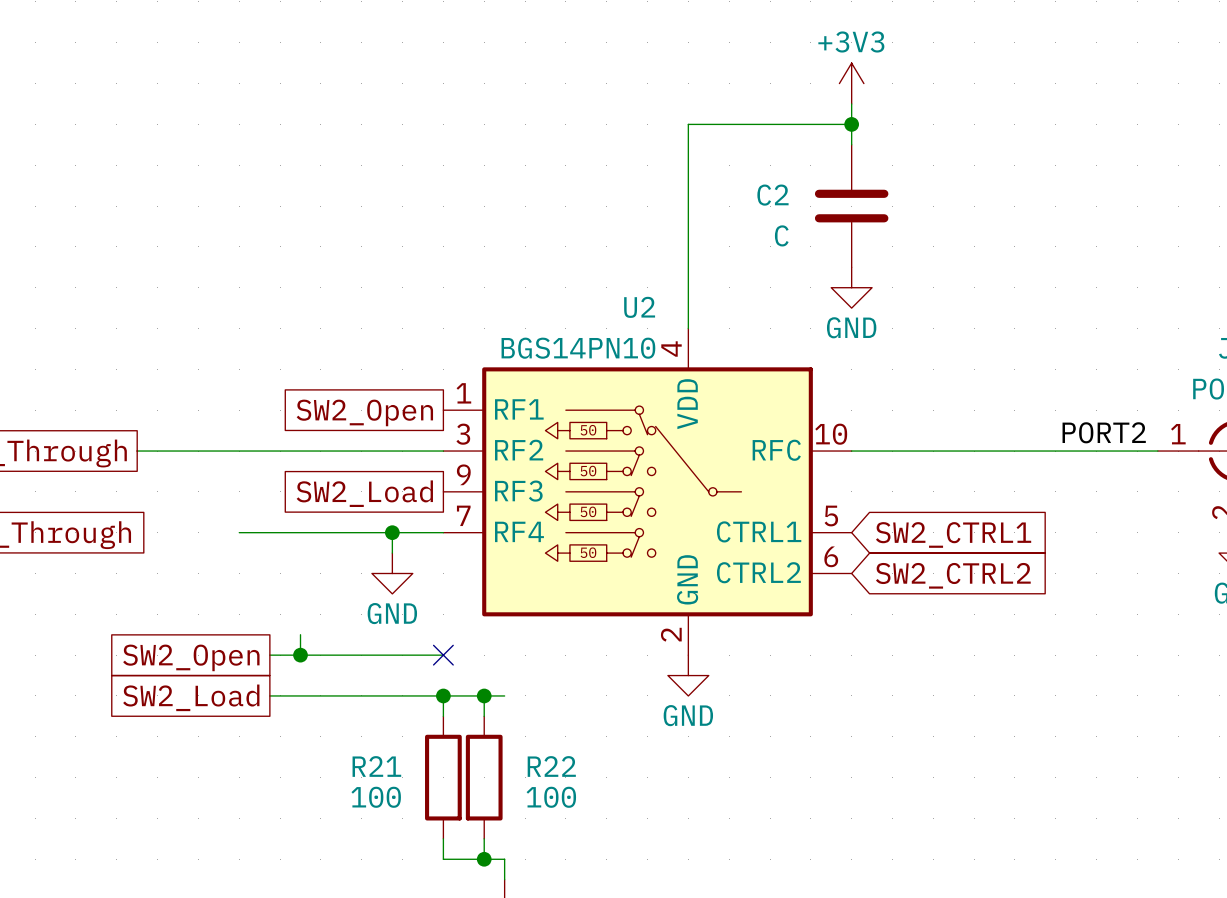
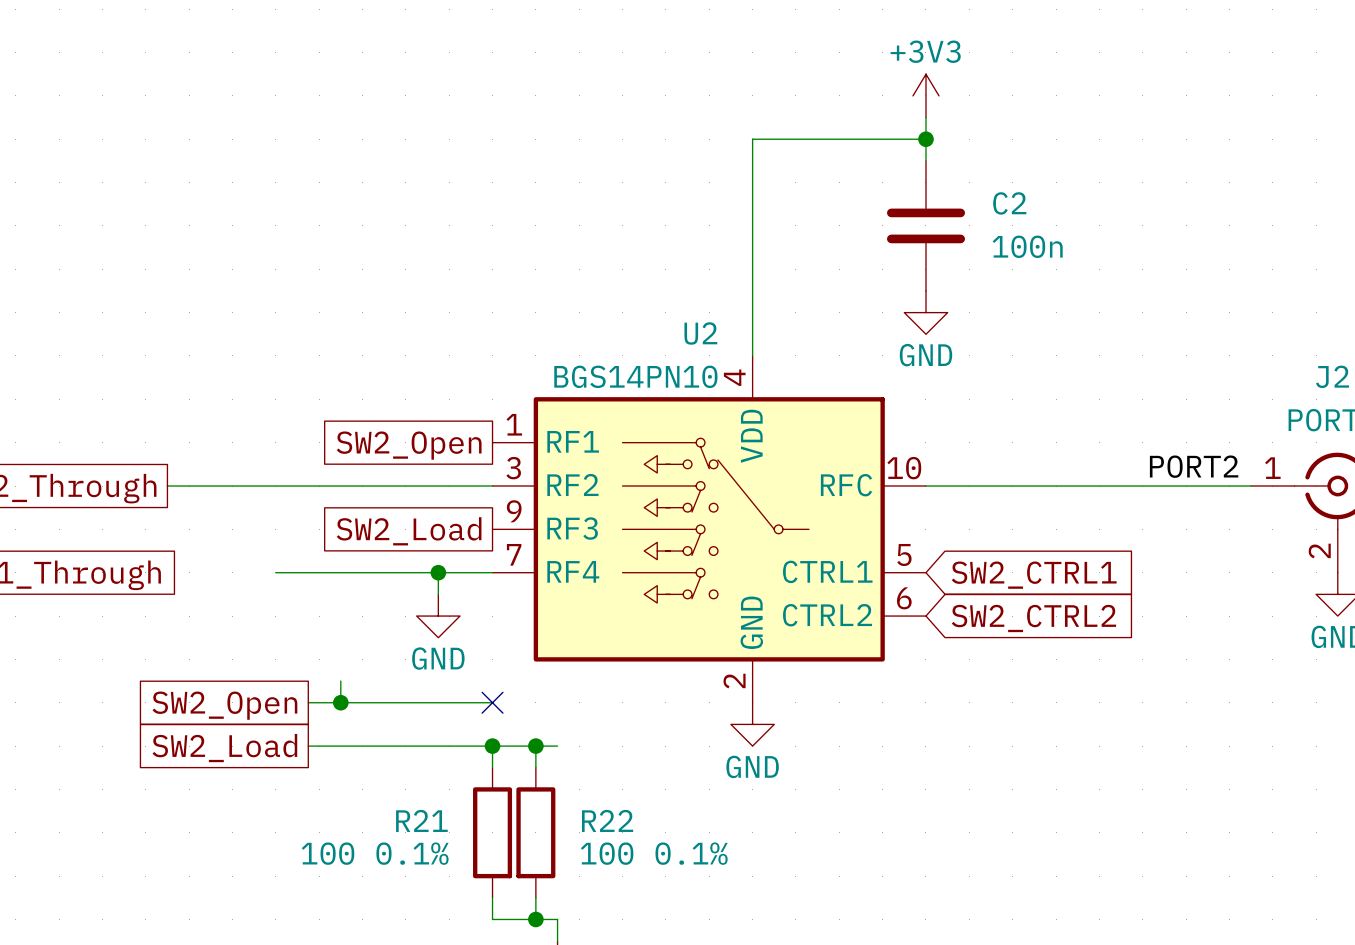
C2 name position: C2 (772, 195) -> C2 (1009, 203)
C2 value: C (781, 235) -> 100n (1027, 246)
U2 symbol: [443, 328, 852, 656] -> [492, 355, 926, 703]
R21 value: 100 (376, 797) -> 100 0.1% (375, 853)
R22 value: 100 (551, 797) -> 100 0.1% (654, 853)

